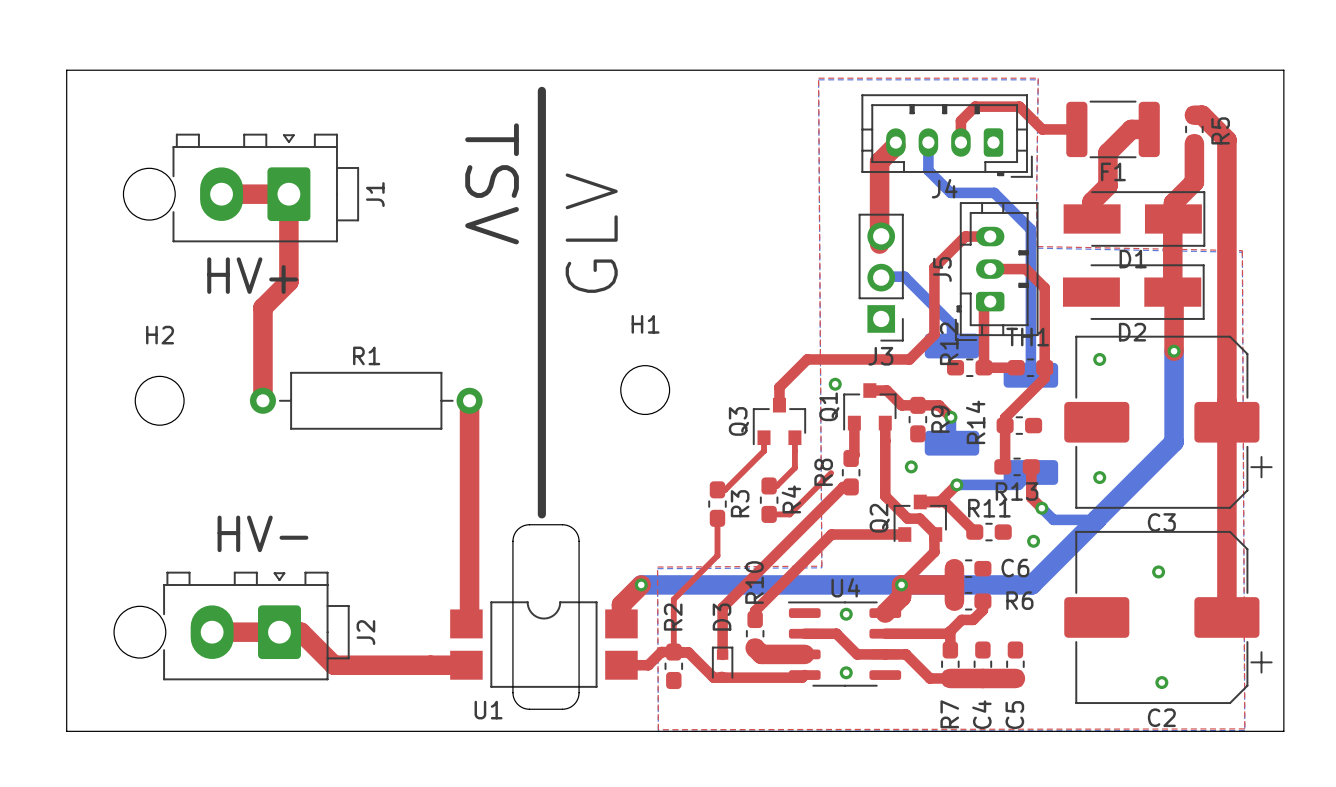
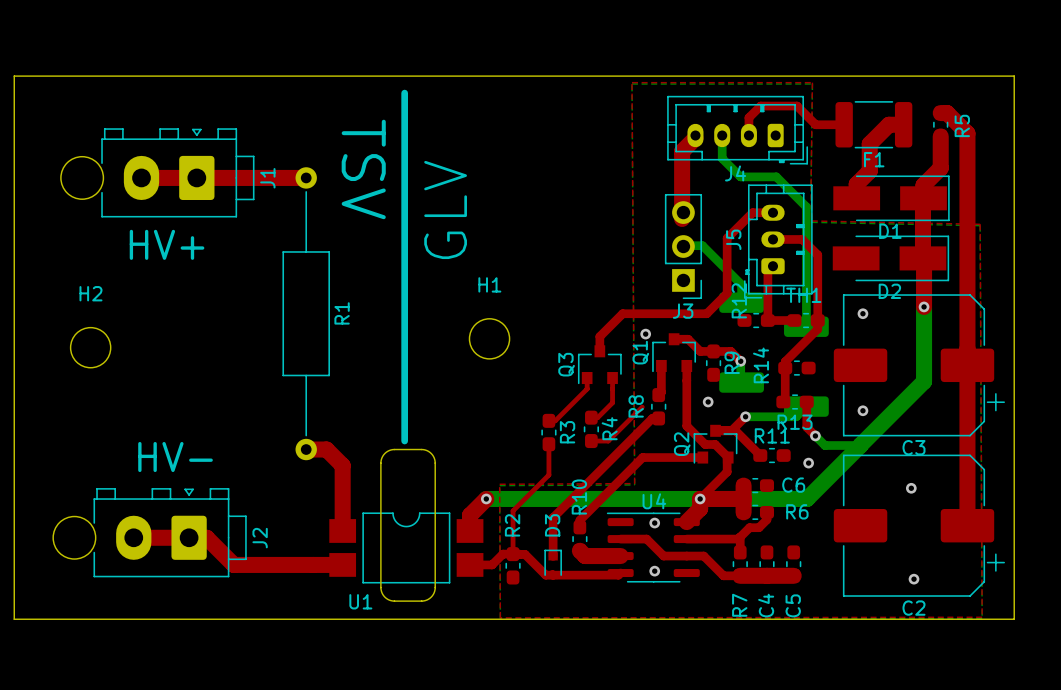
top track: (288, 194) (288, 281) (262, 307) (262, 400) -> (196, 177) (306, 177)
R1 name position: R1 (366, 355) -> R1 (342, 313)
R1 footprint: [249, 371, 483, 430] -> [282, 167, 331, 461]
top track: (469, 400) (469, 620) (466, 623) -> (306, 449) (326, 449) (342, 465) (342, 530)

